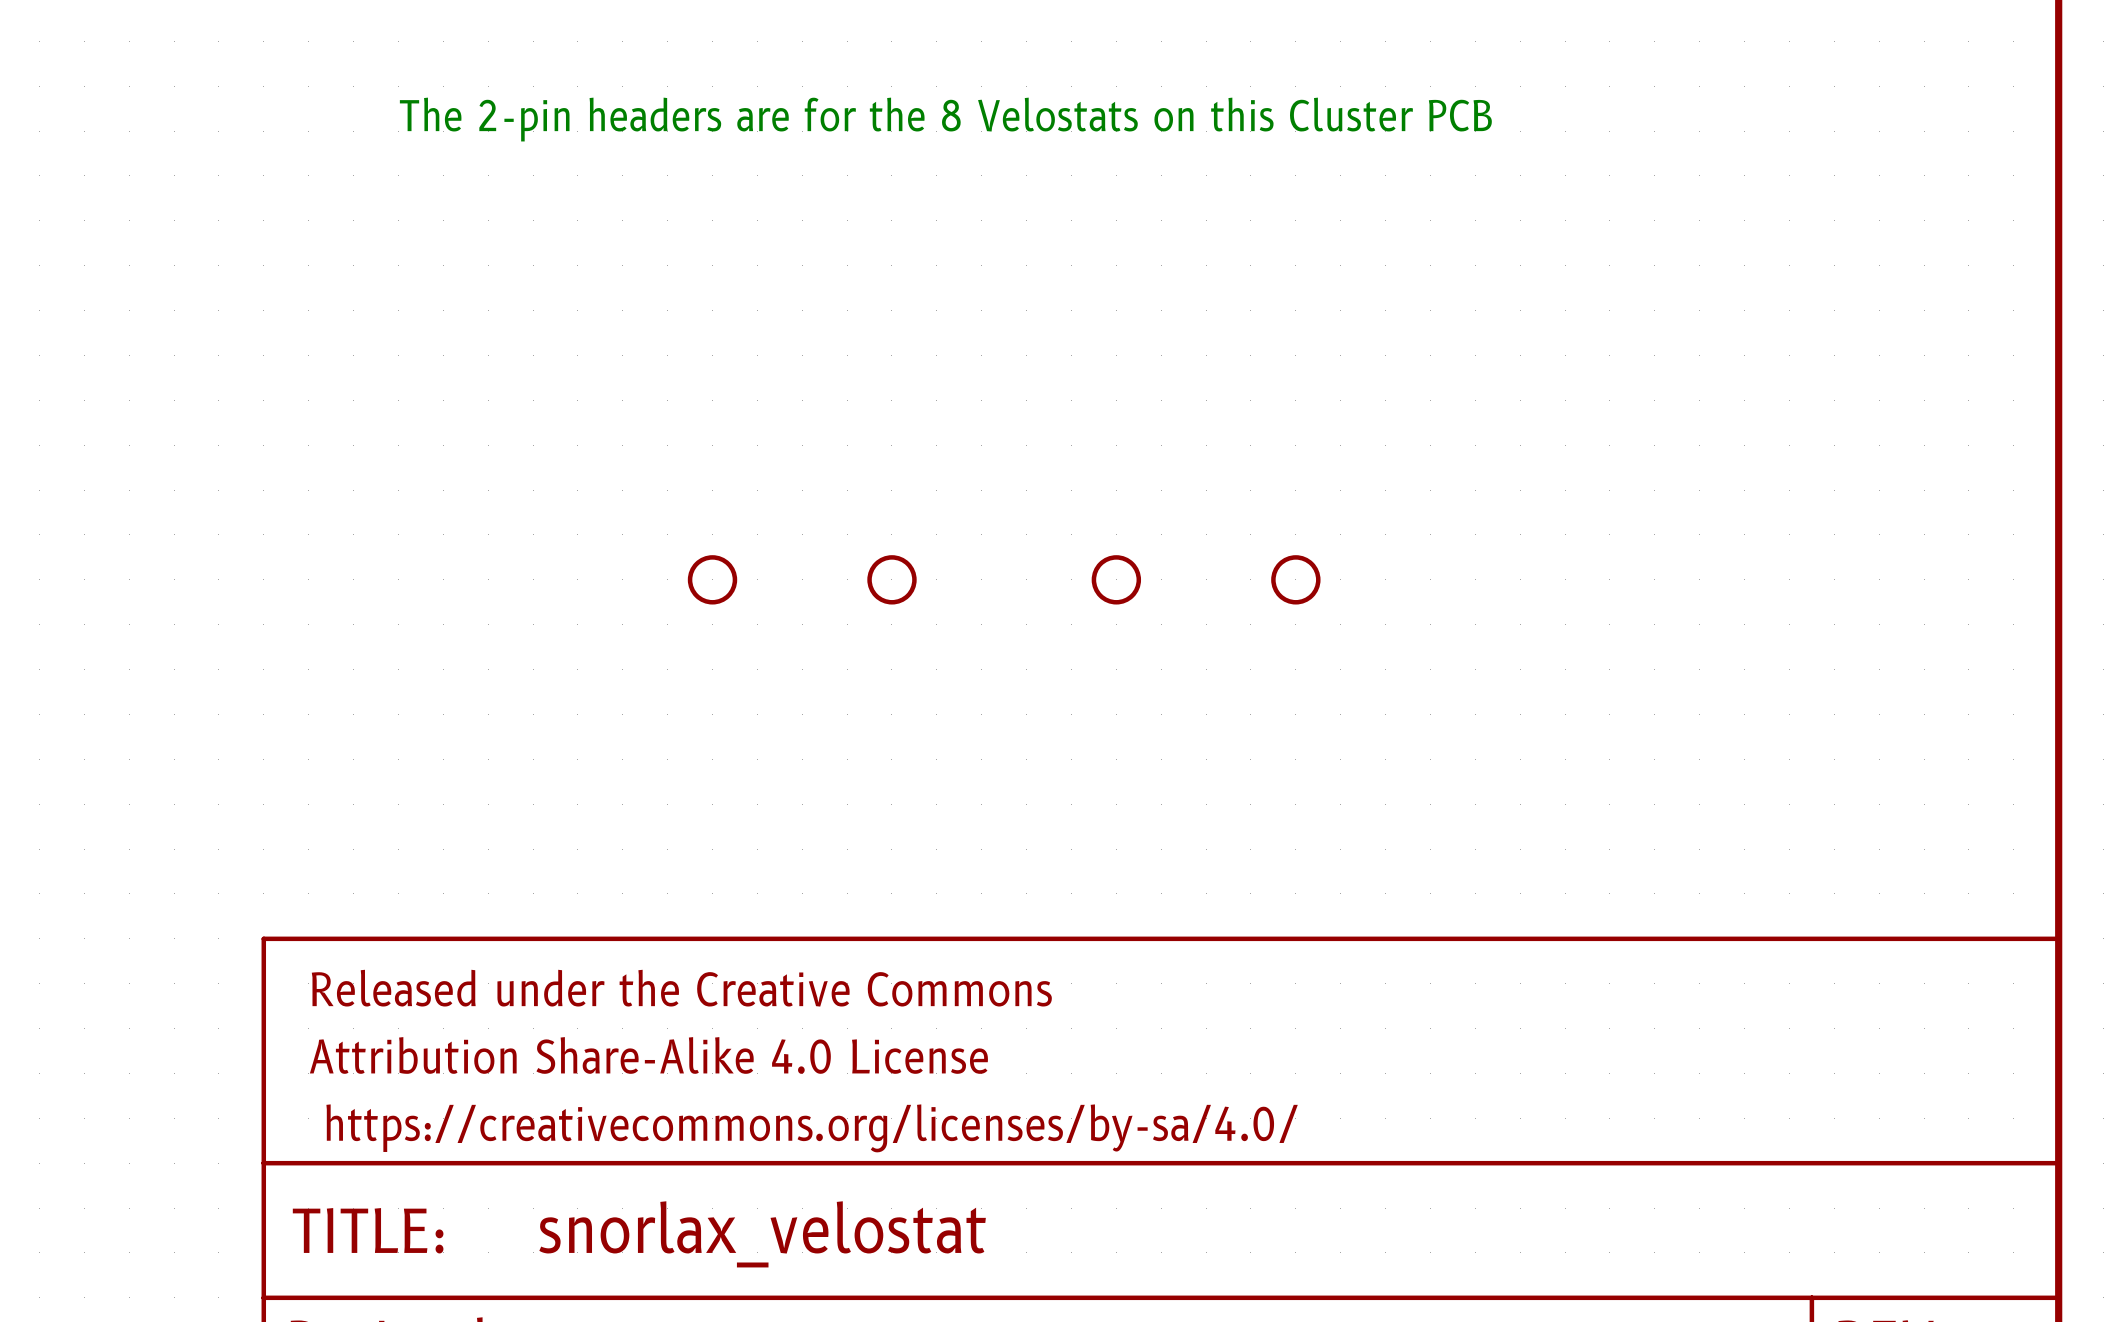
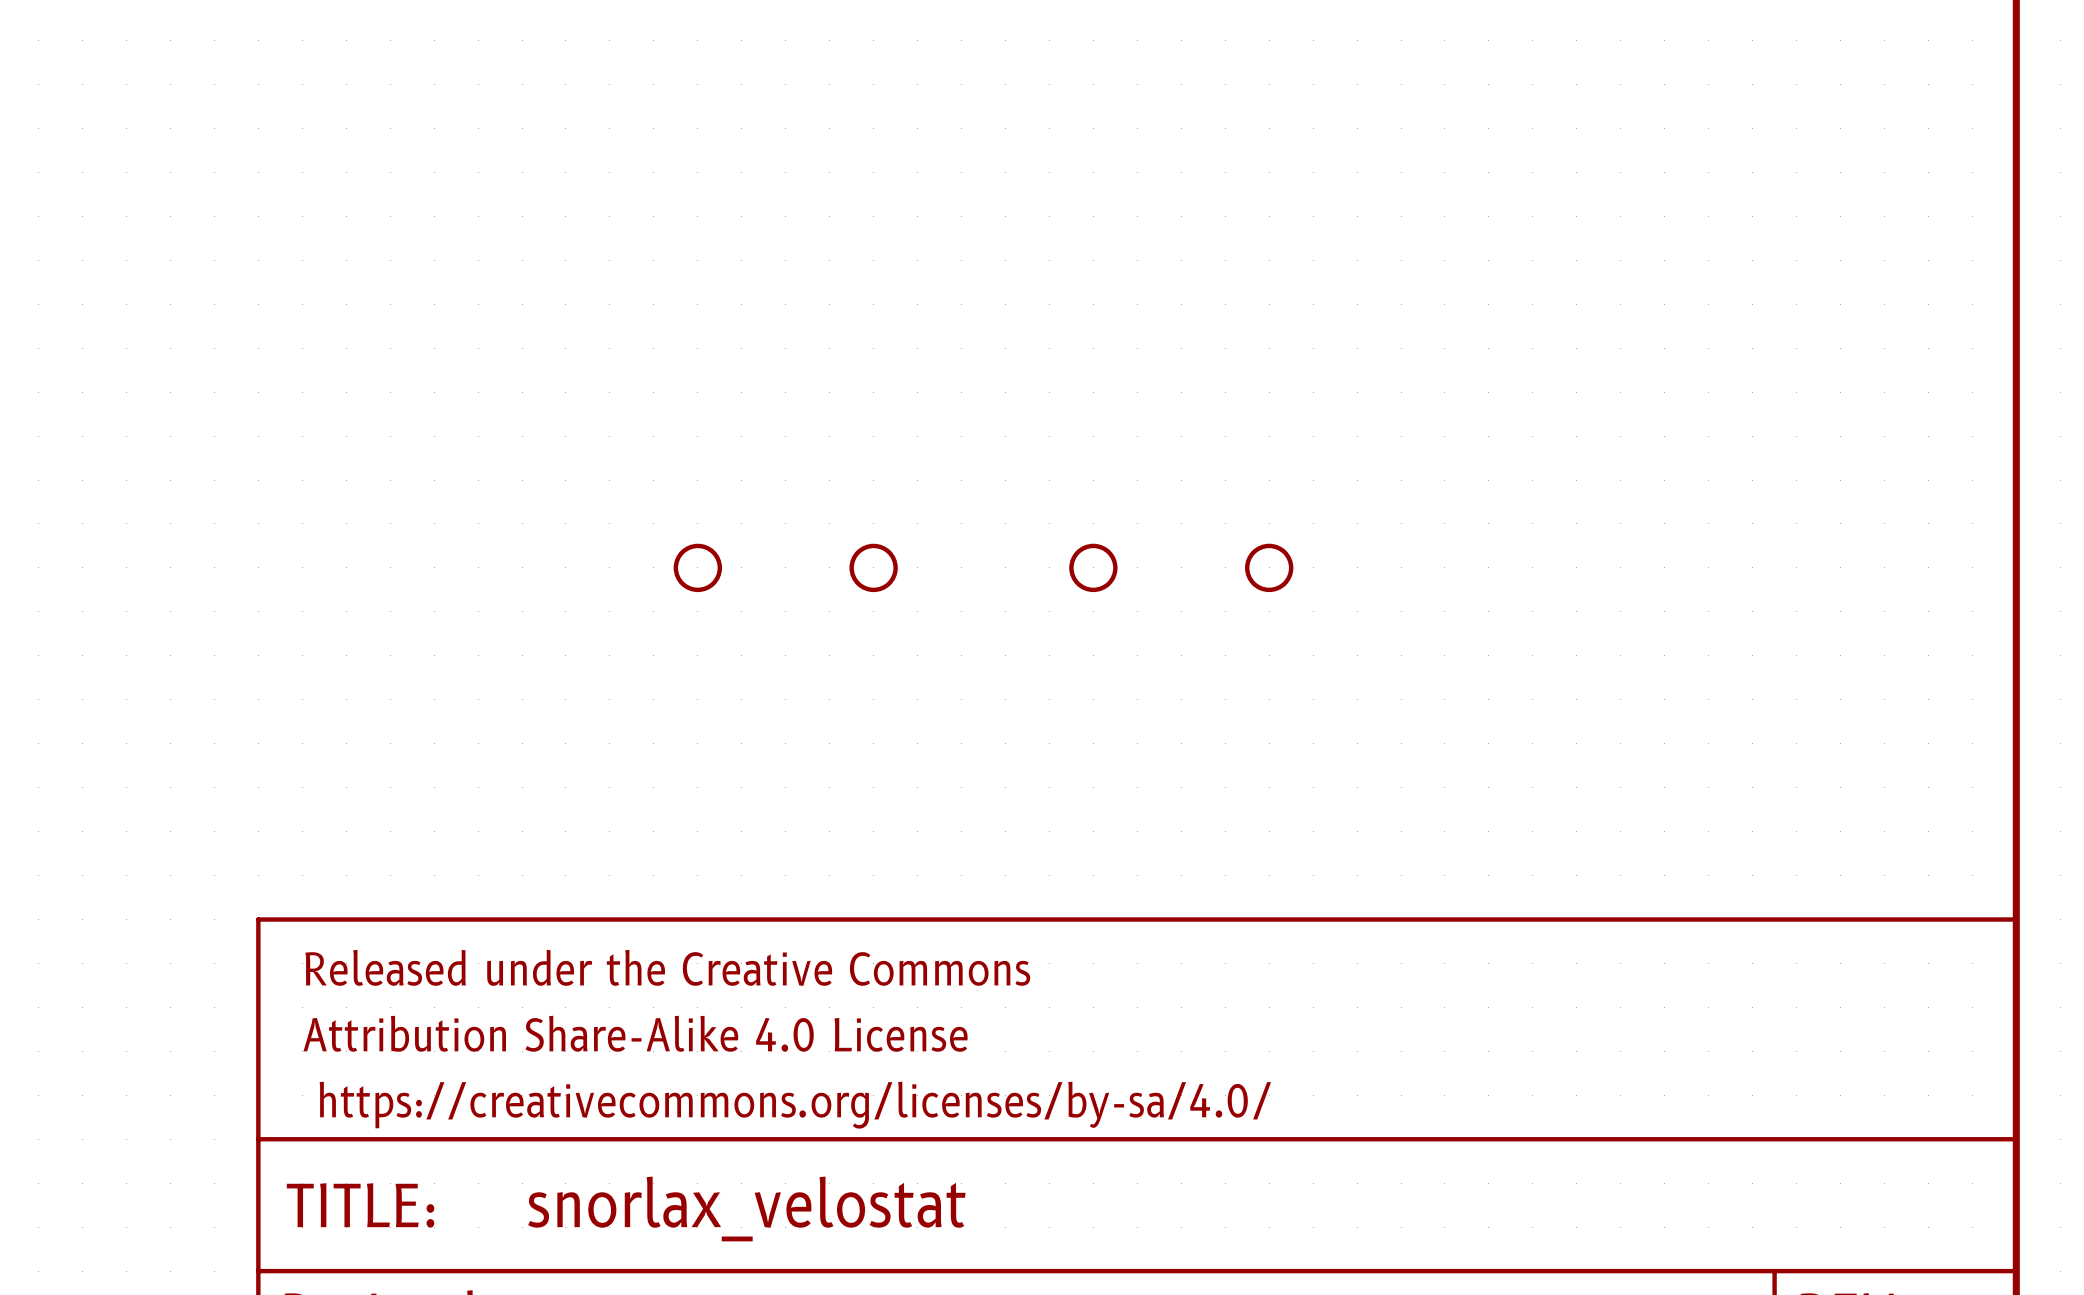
text: The 2-pin headers are for the 8 Velostats on this Cluster PCB (945, 119) -> none

